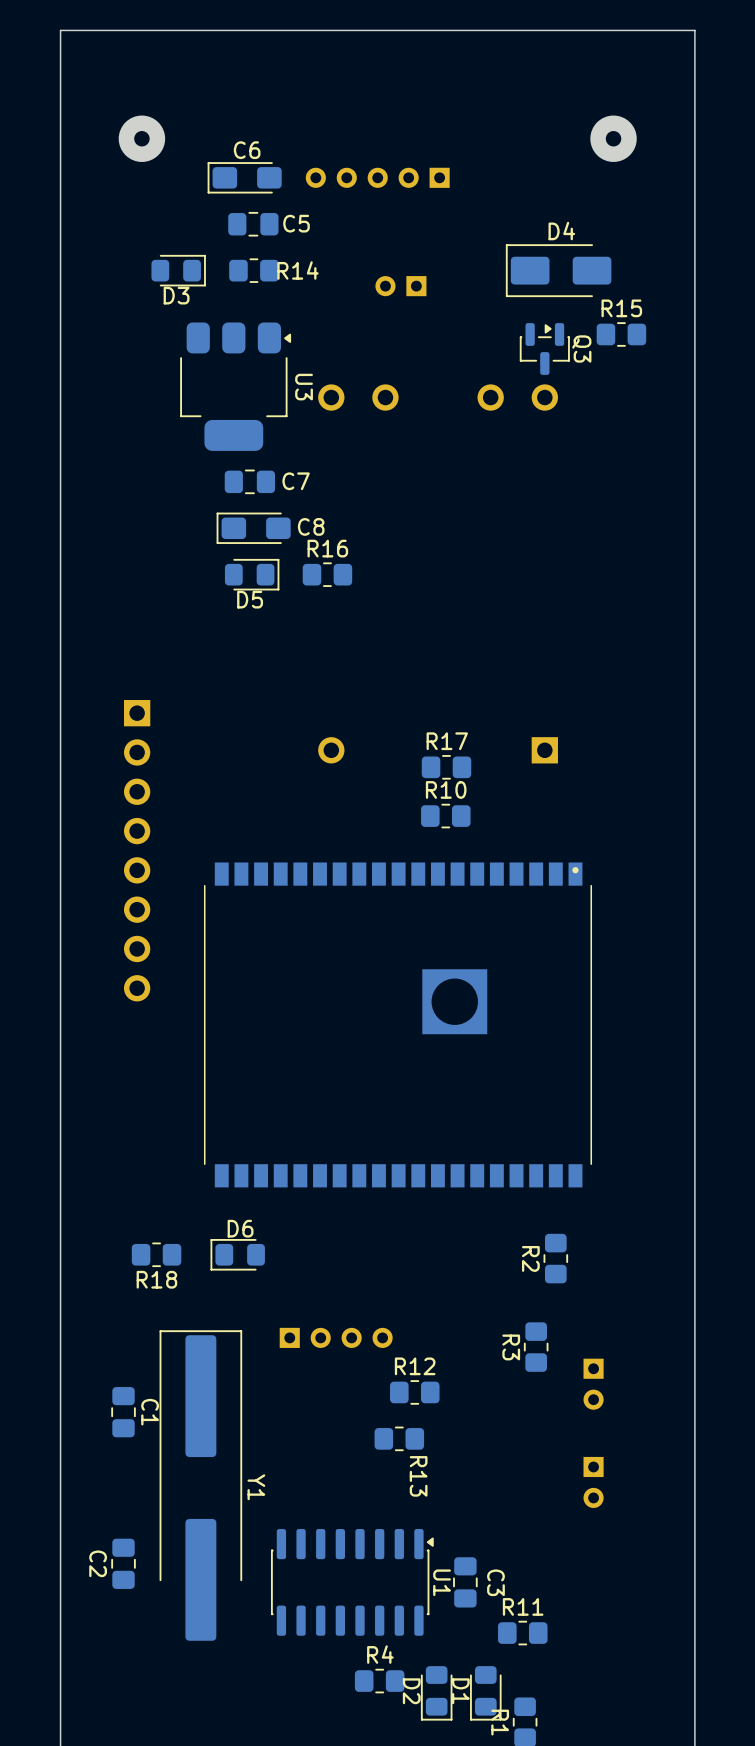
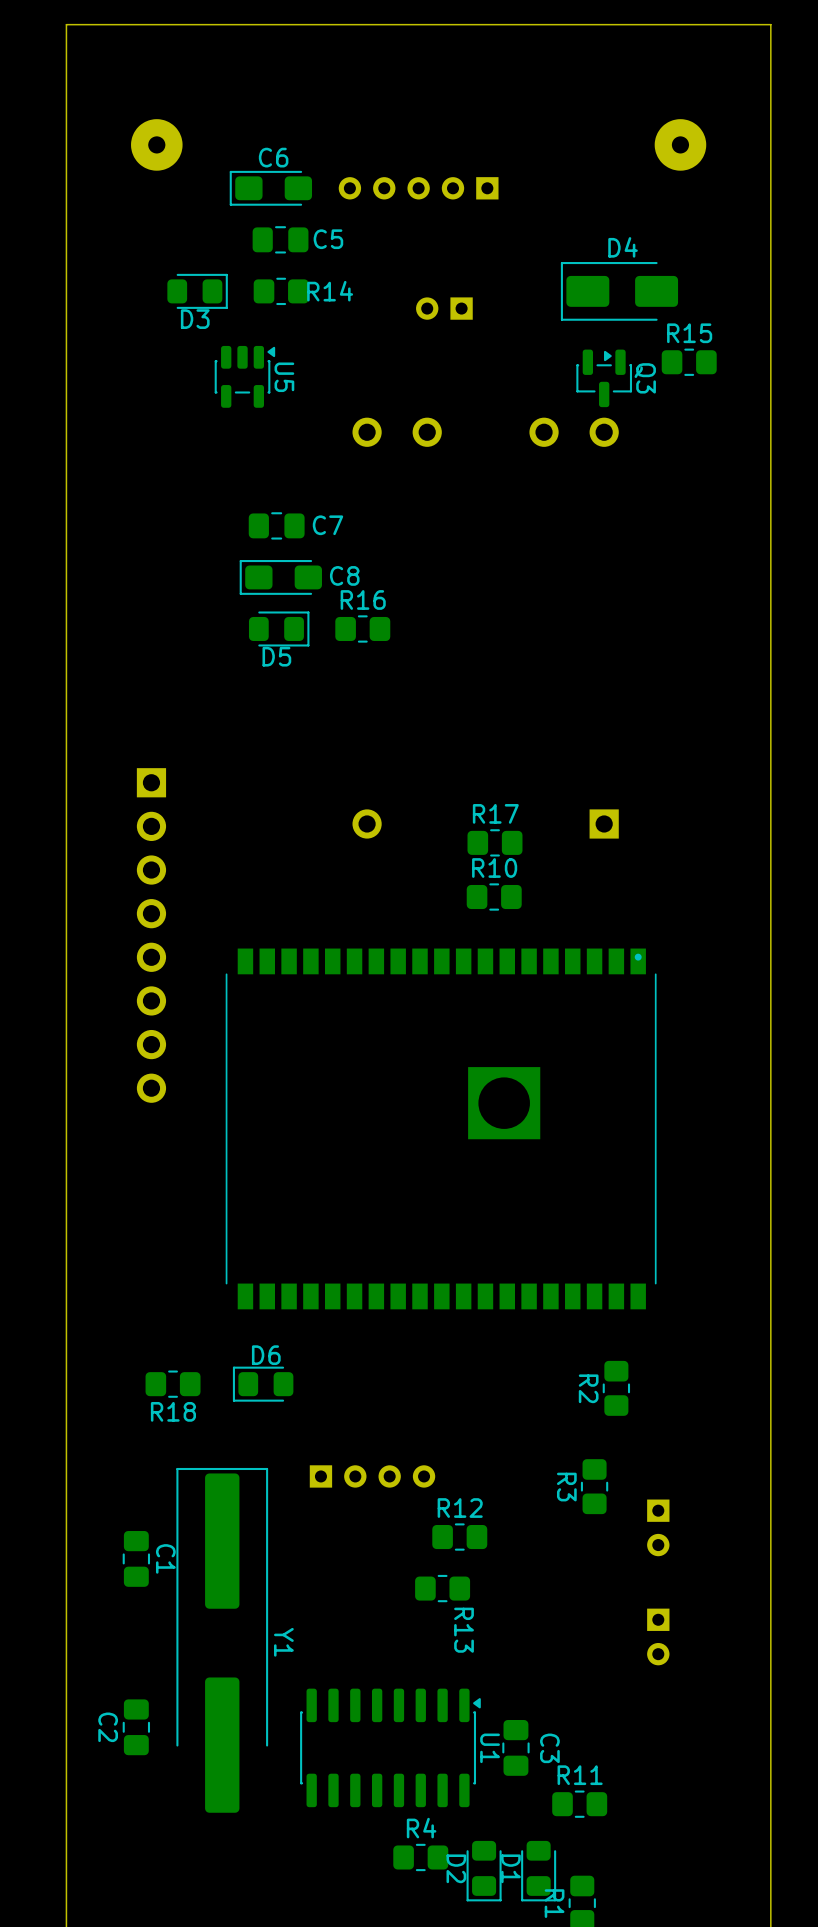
U5: none -> (244, 376)
U3: (235, 386) -> none

